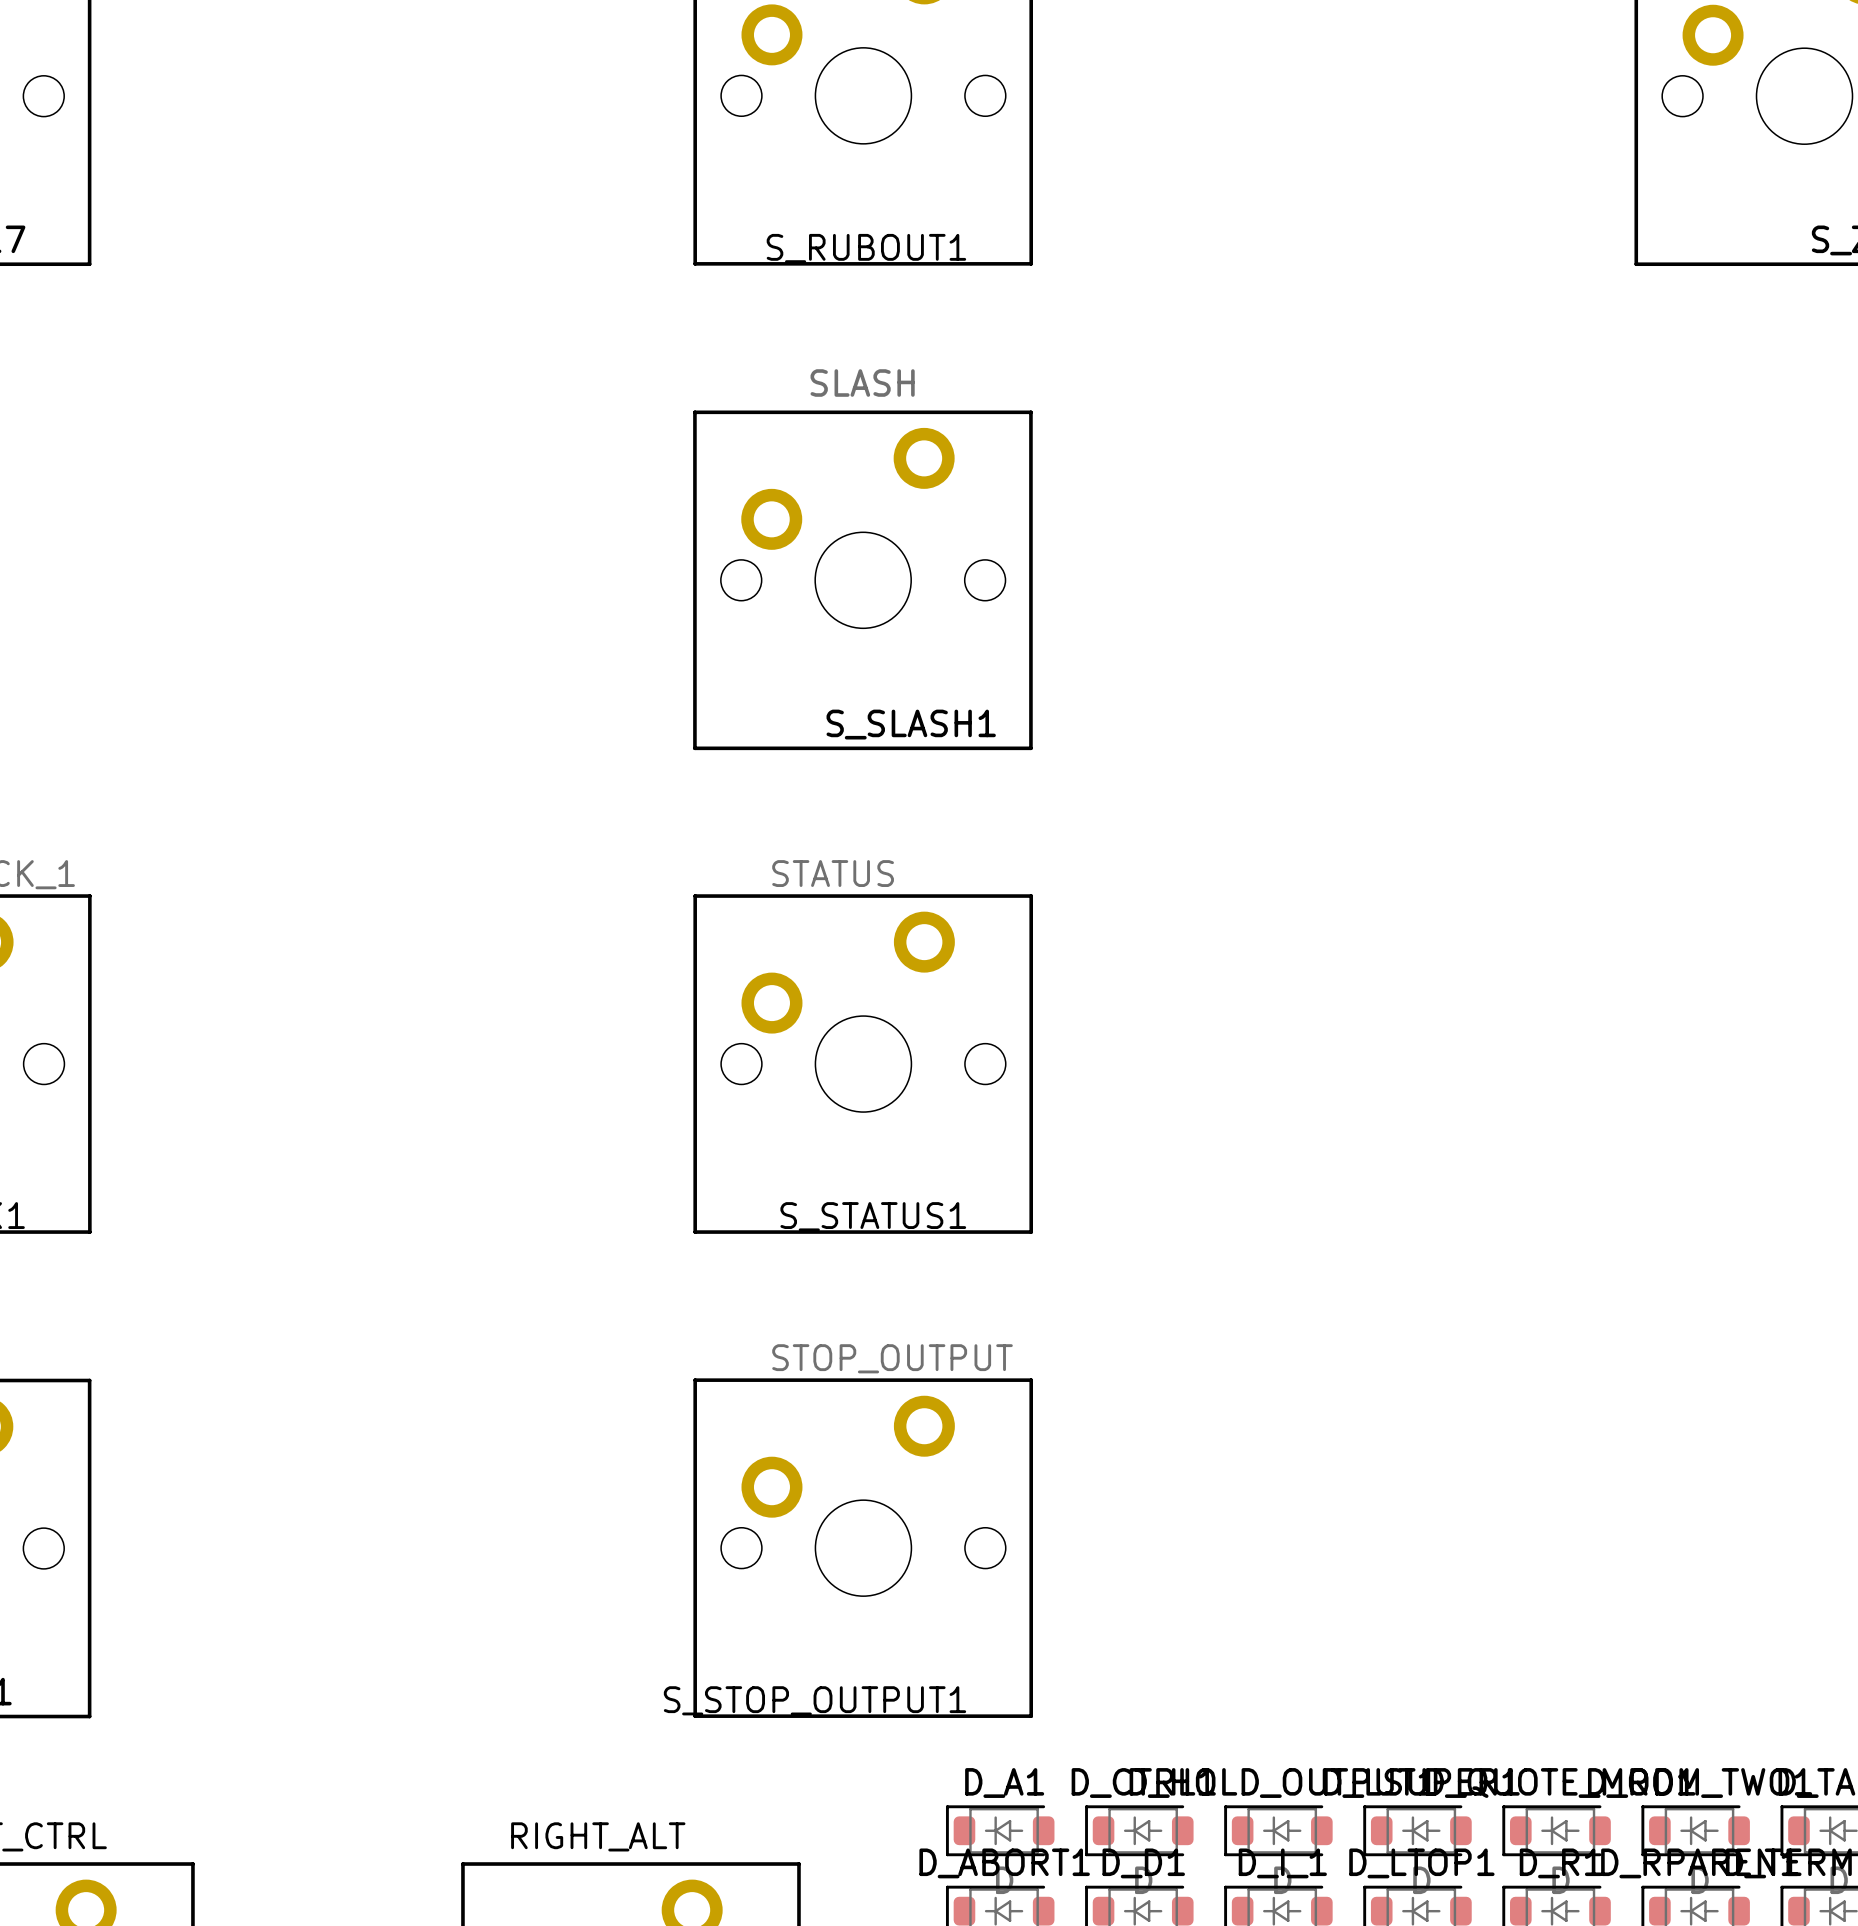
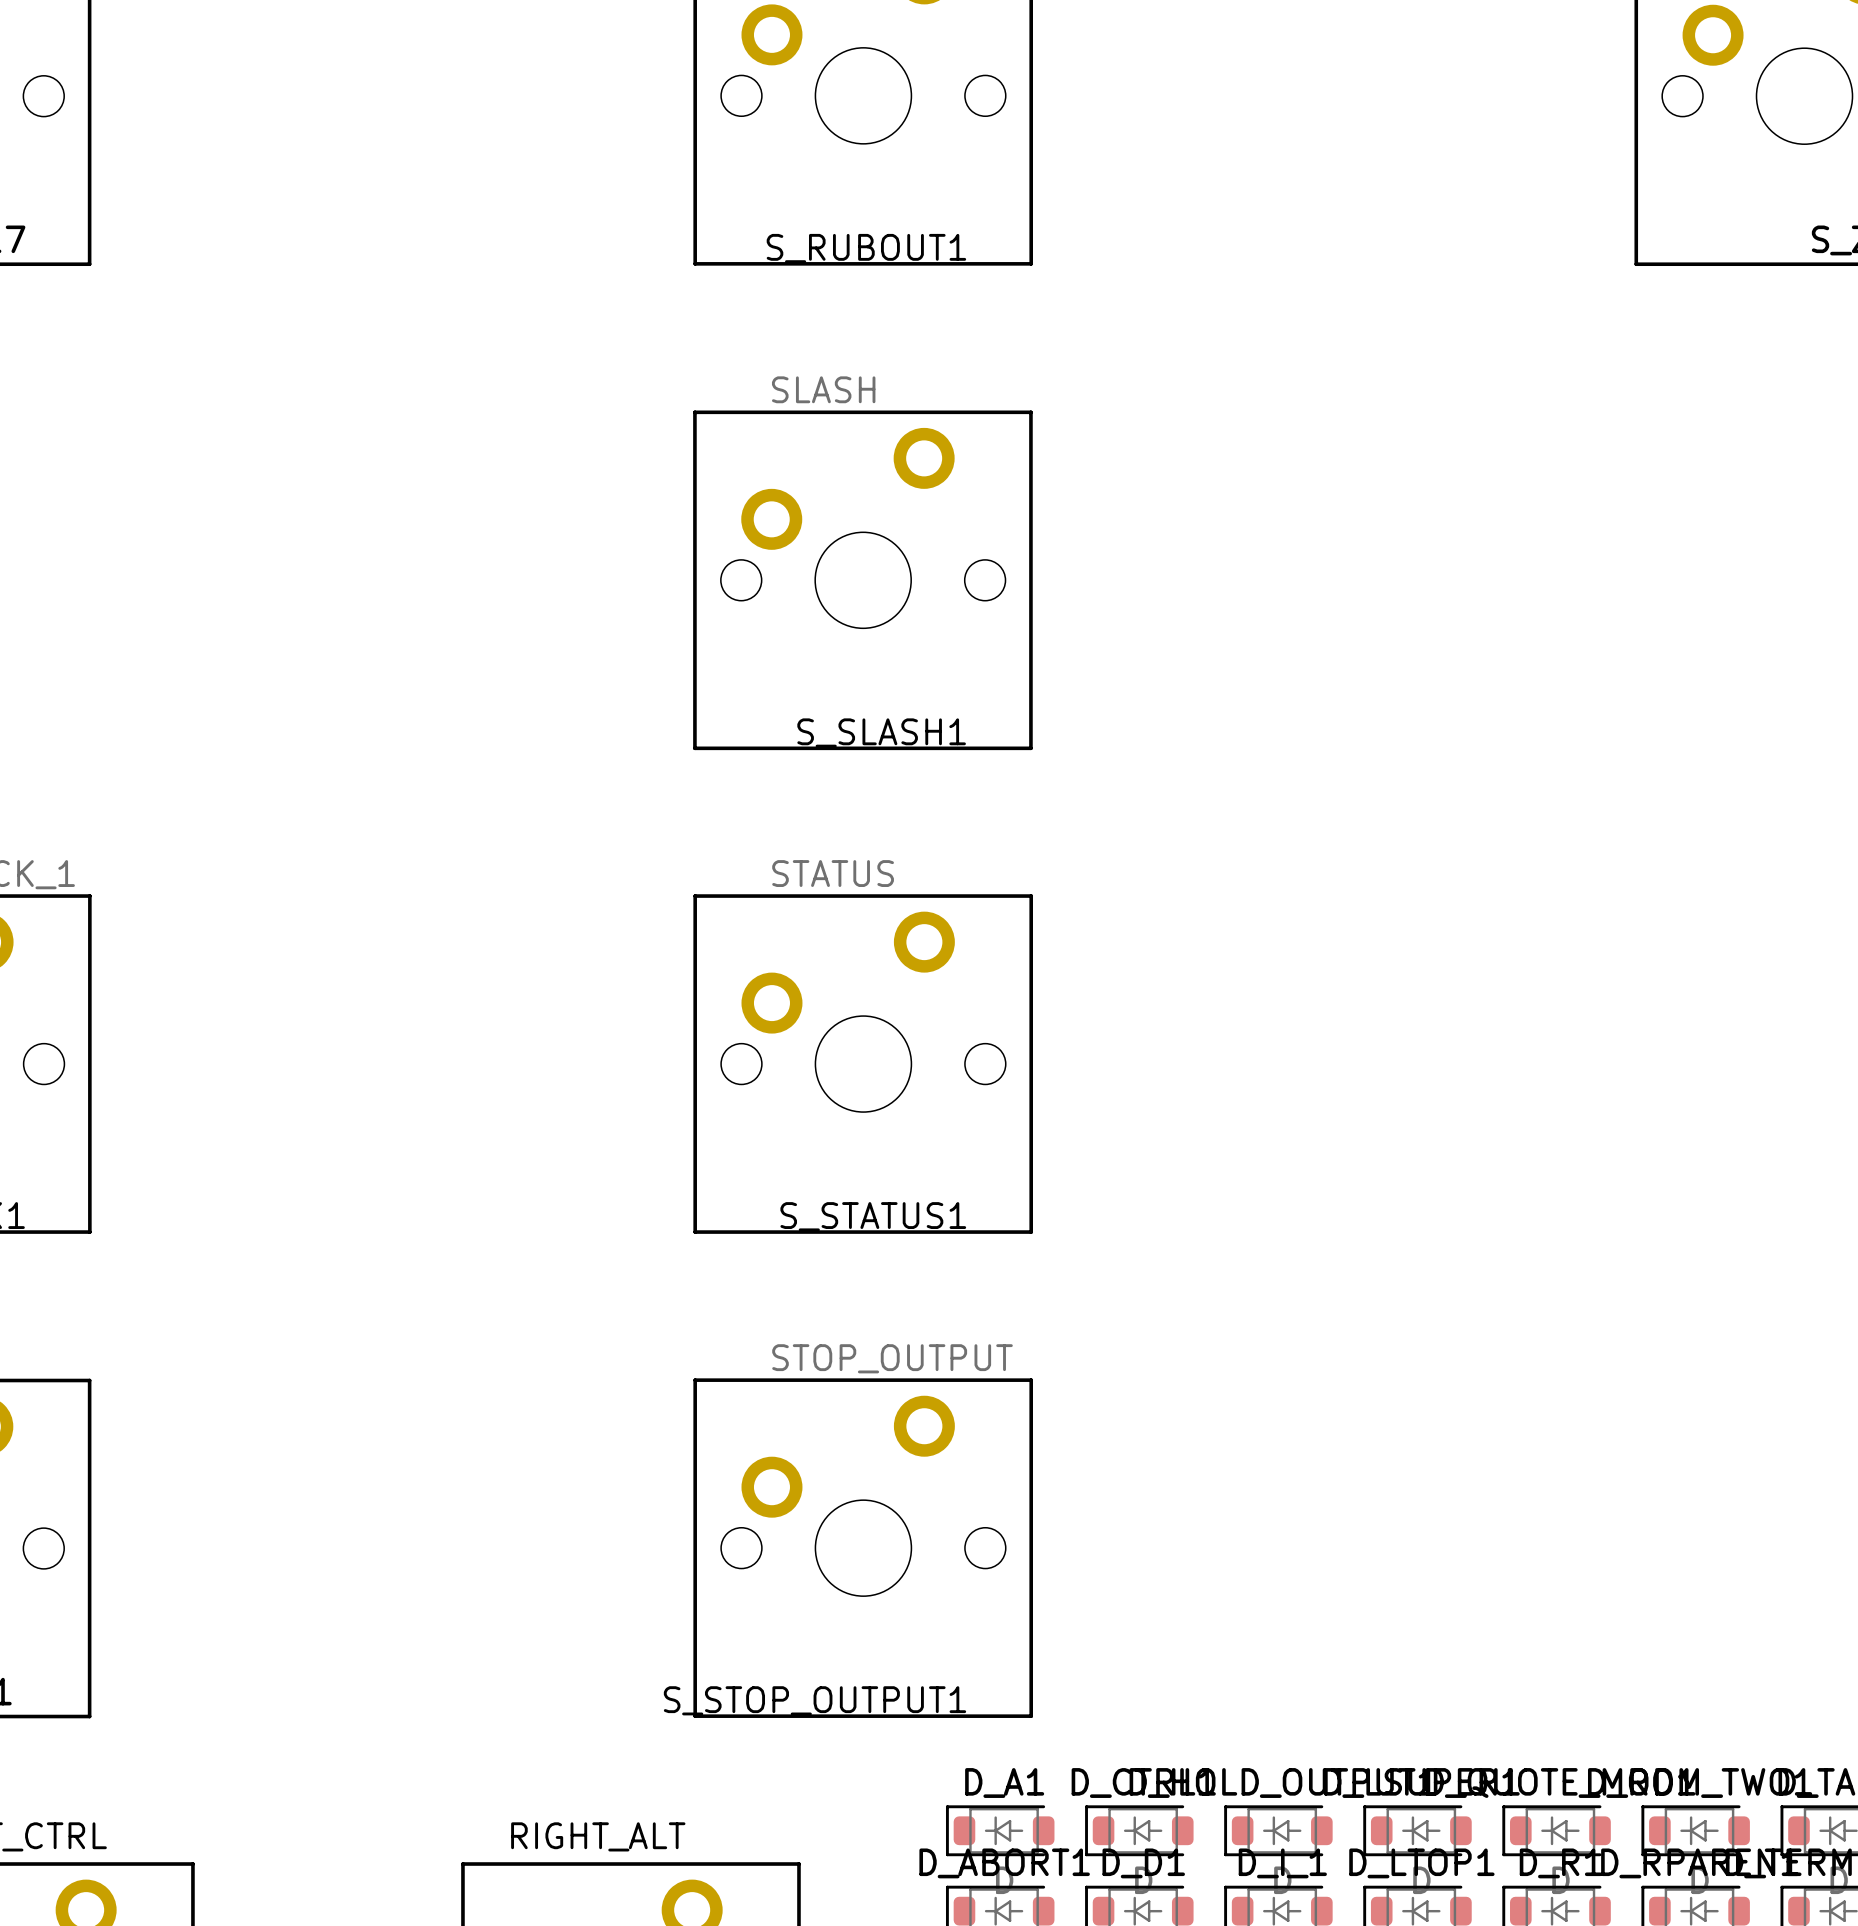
S_SLASH1 value position: SLASH (862, 383) -> SLASH (823, 389)
S_SLASH1 name position: S_SLASH1 (911, 724) -> S_SLASH1 (881, 732)

